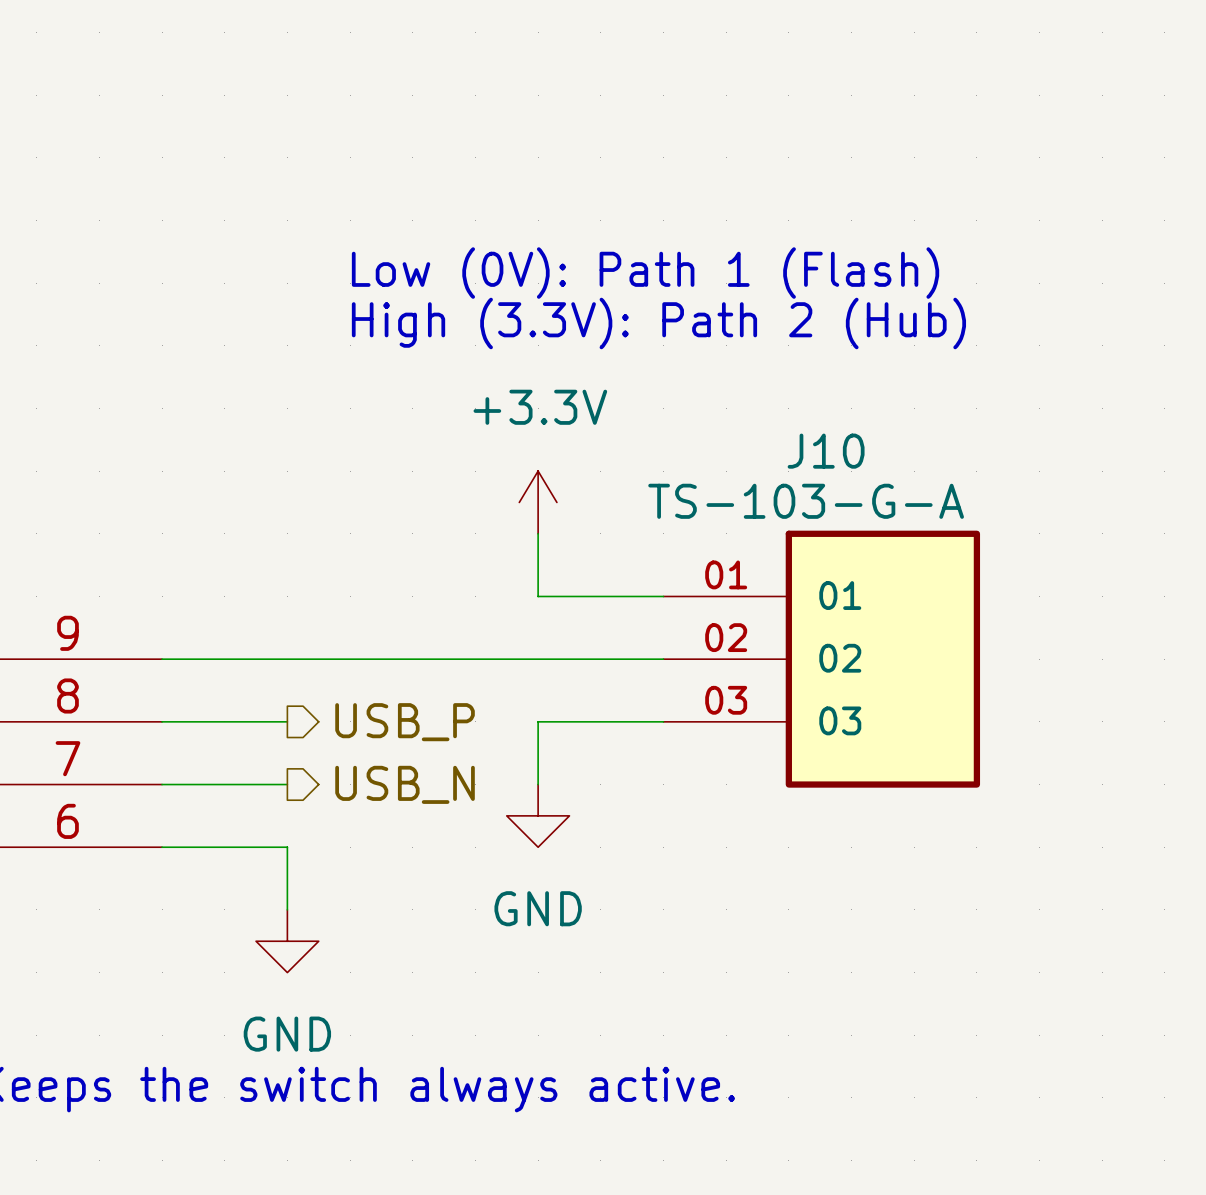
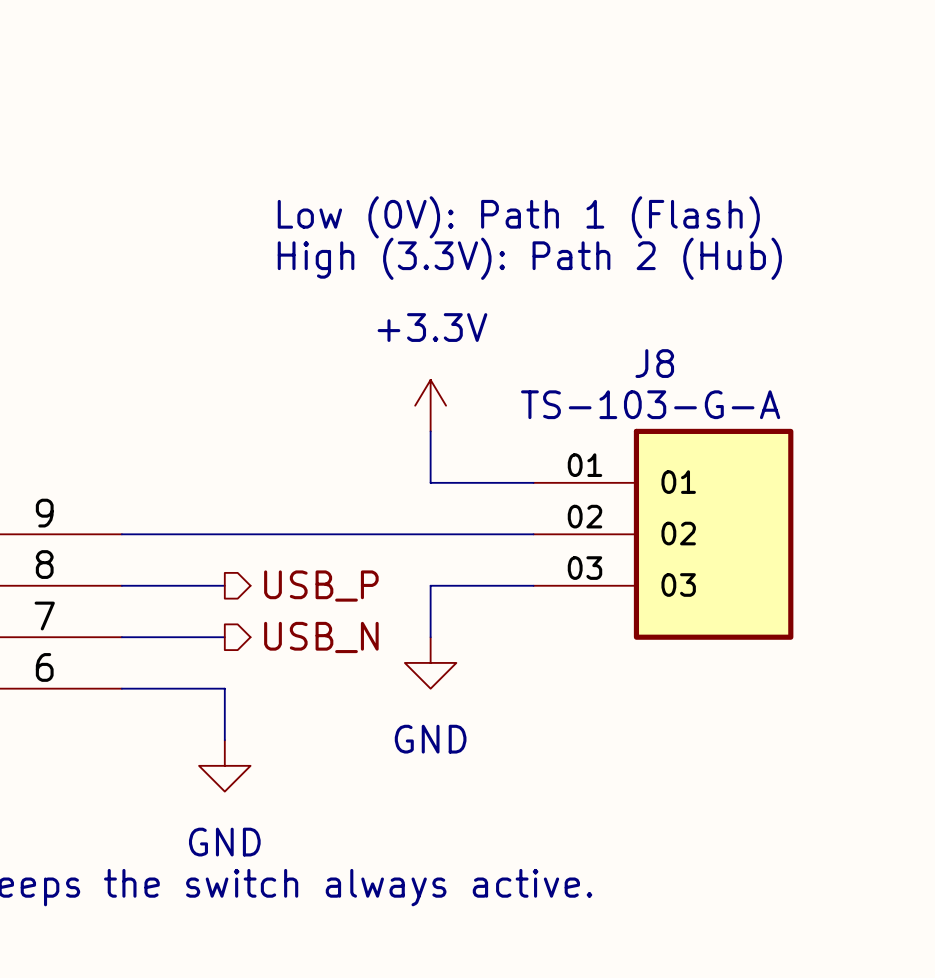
J10 name: J10 (826, 451) -> J8 (654, 363)

